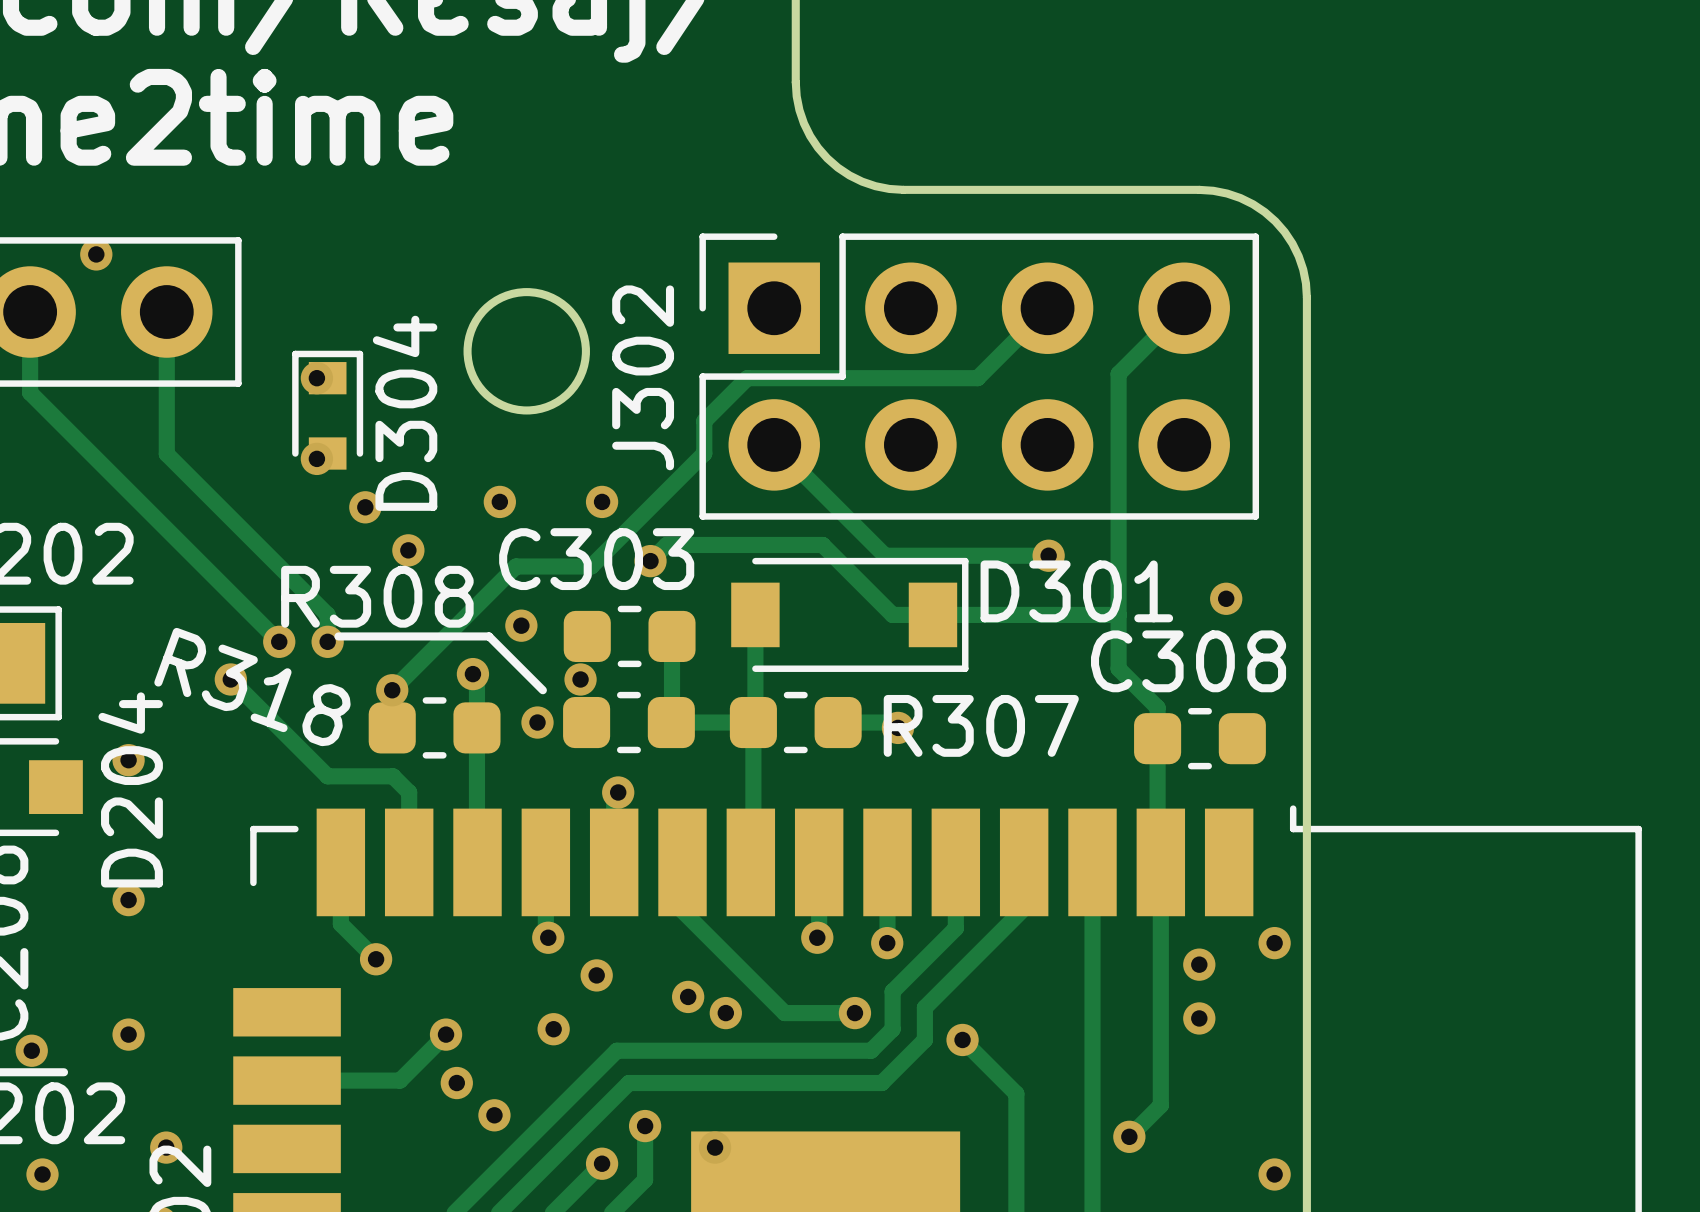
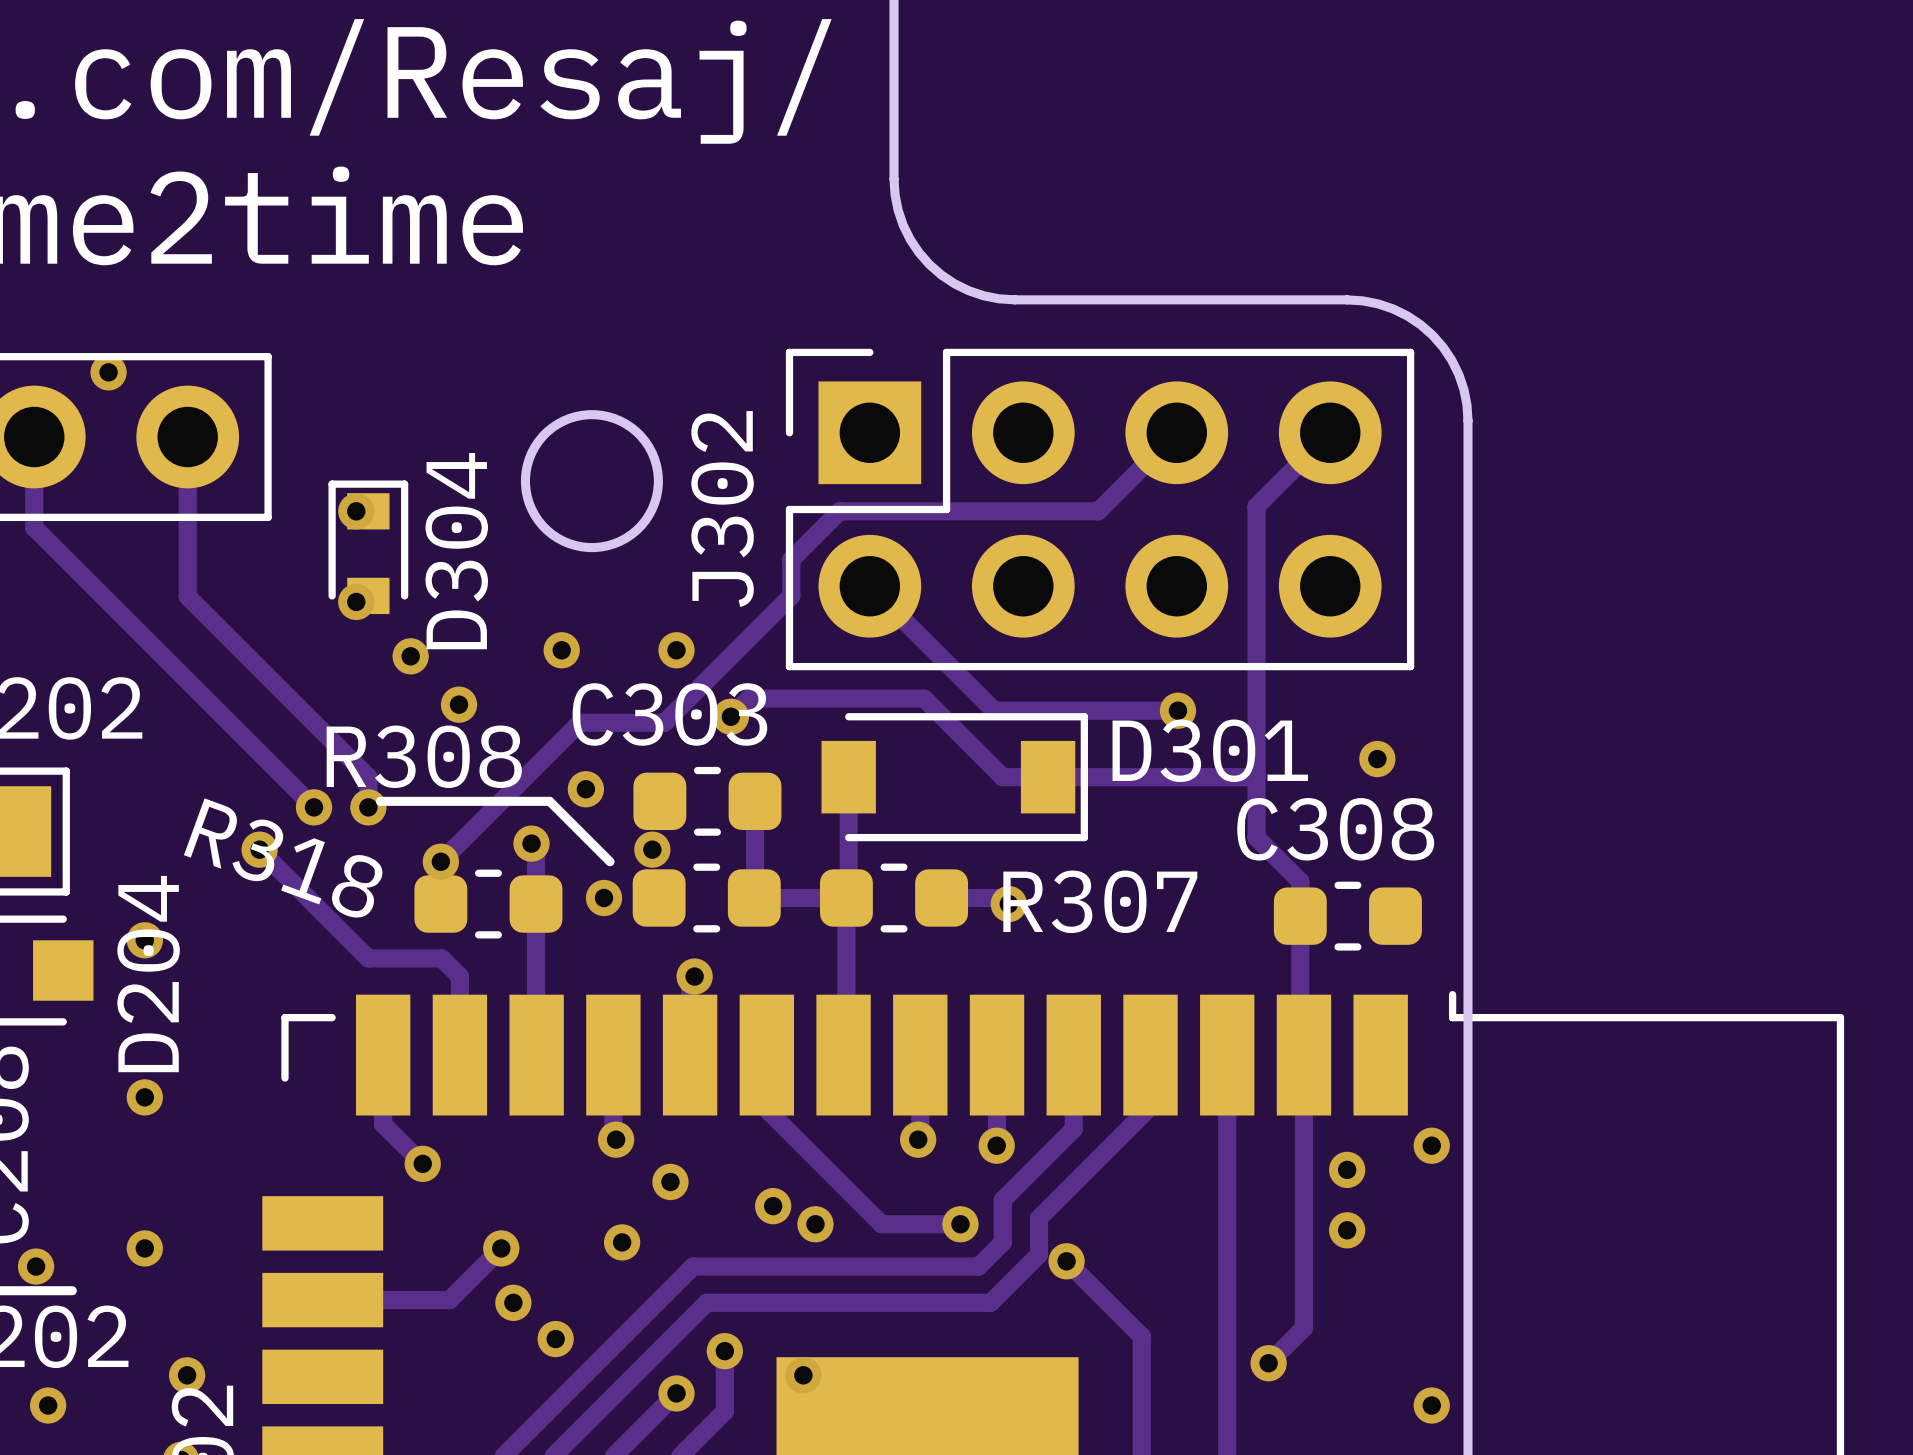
track: (962, 1039) (1016, 1093) (1016, 1112) -> (1066, 1261) (1141, 1336)
via position: (962, 1039) -> (1066, 1261)

